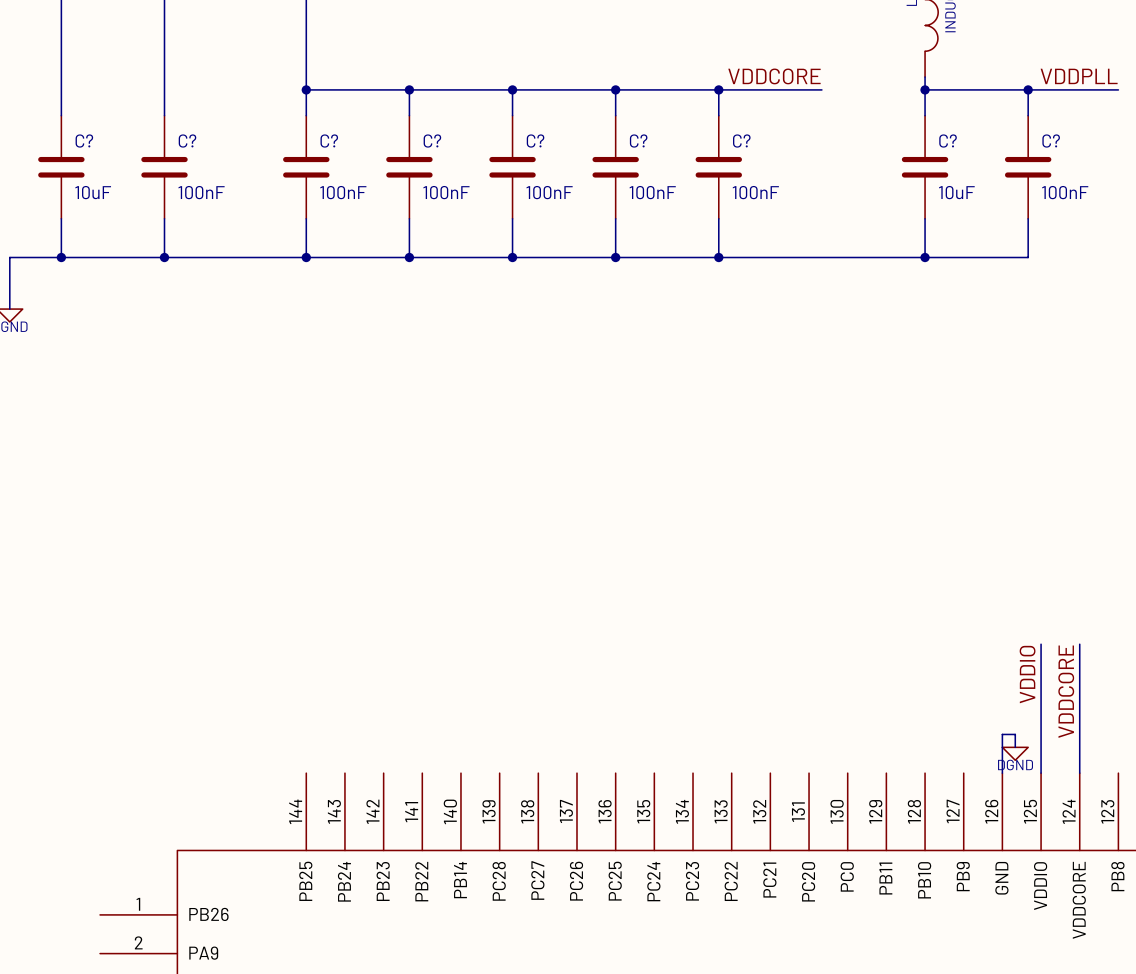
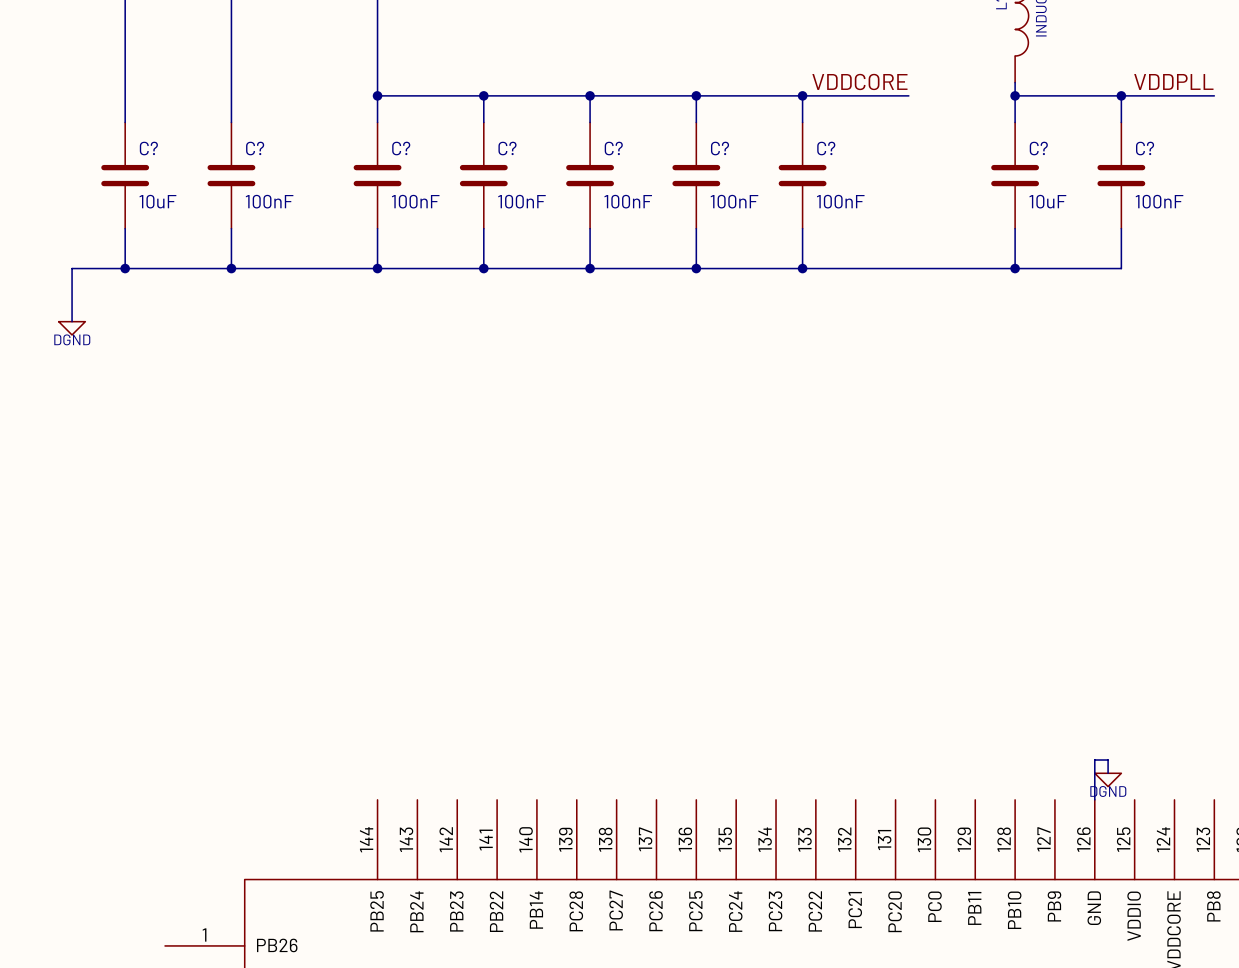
wire: (1041, 644) (1041, 773) -> none
wire: (1079, 644) (1079, 773) -> none
label: VDDIO (1027, 674) -> none
label: VDDCORE (1066, 691) -> none

